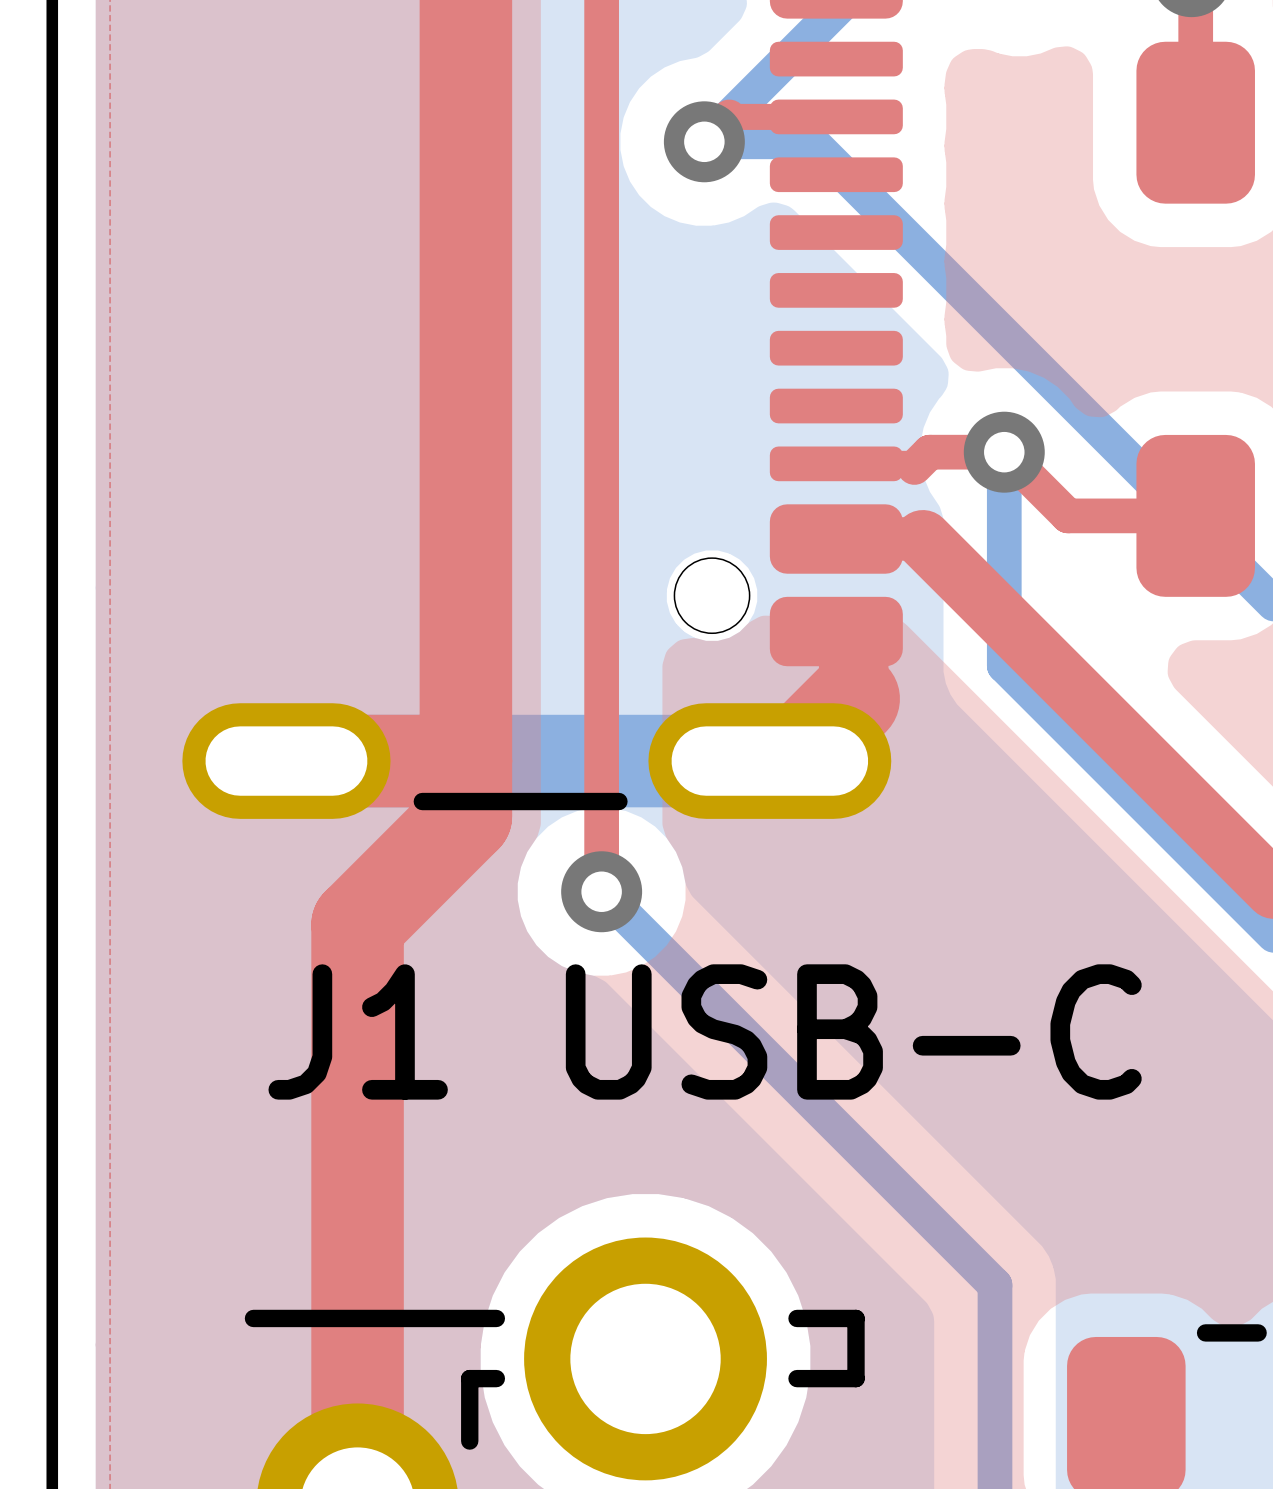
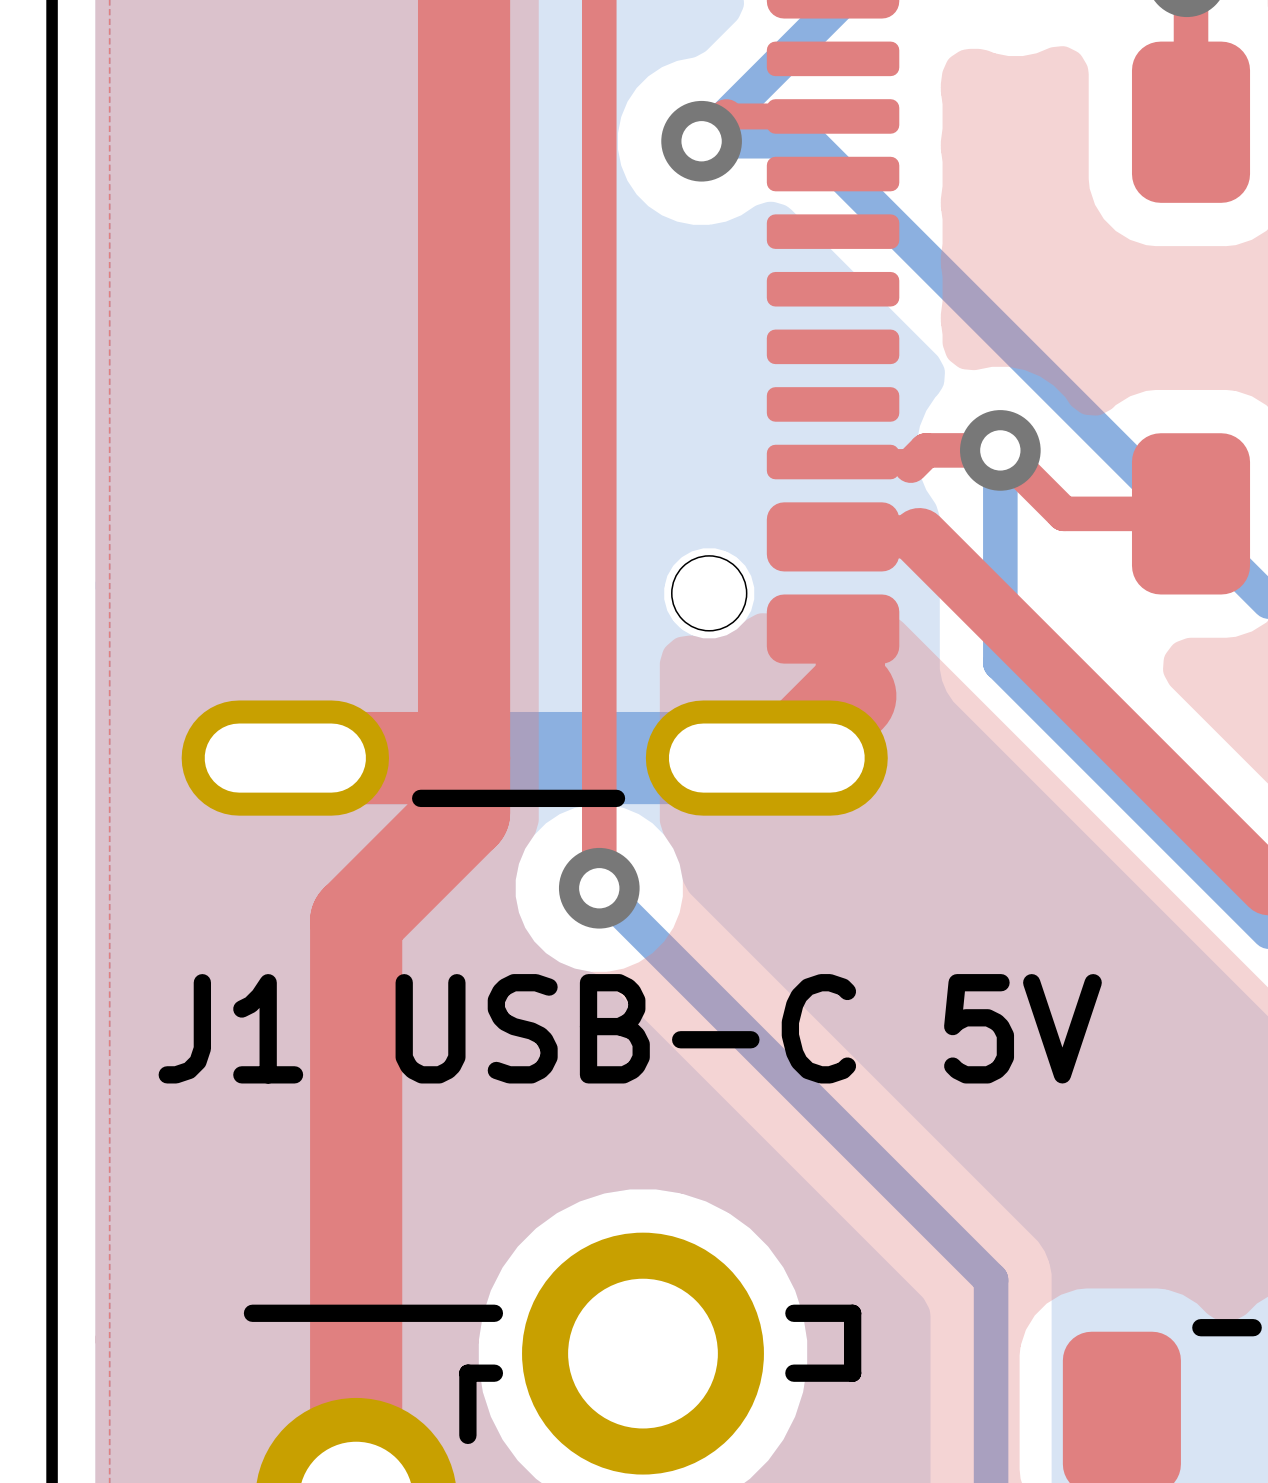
text: J1 USB-C (705, 1031) -> J1 USB-C 5V (630, 1028)

